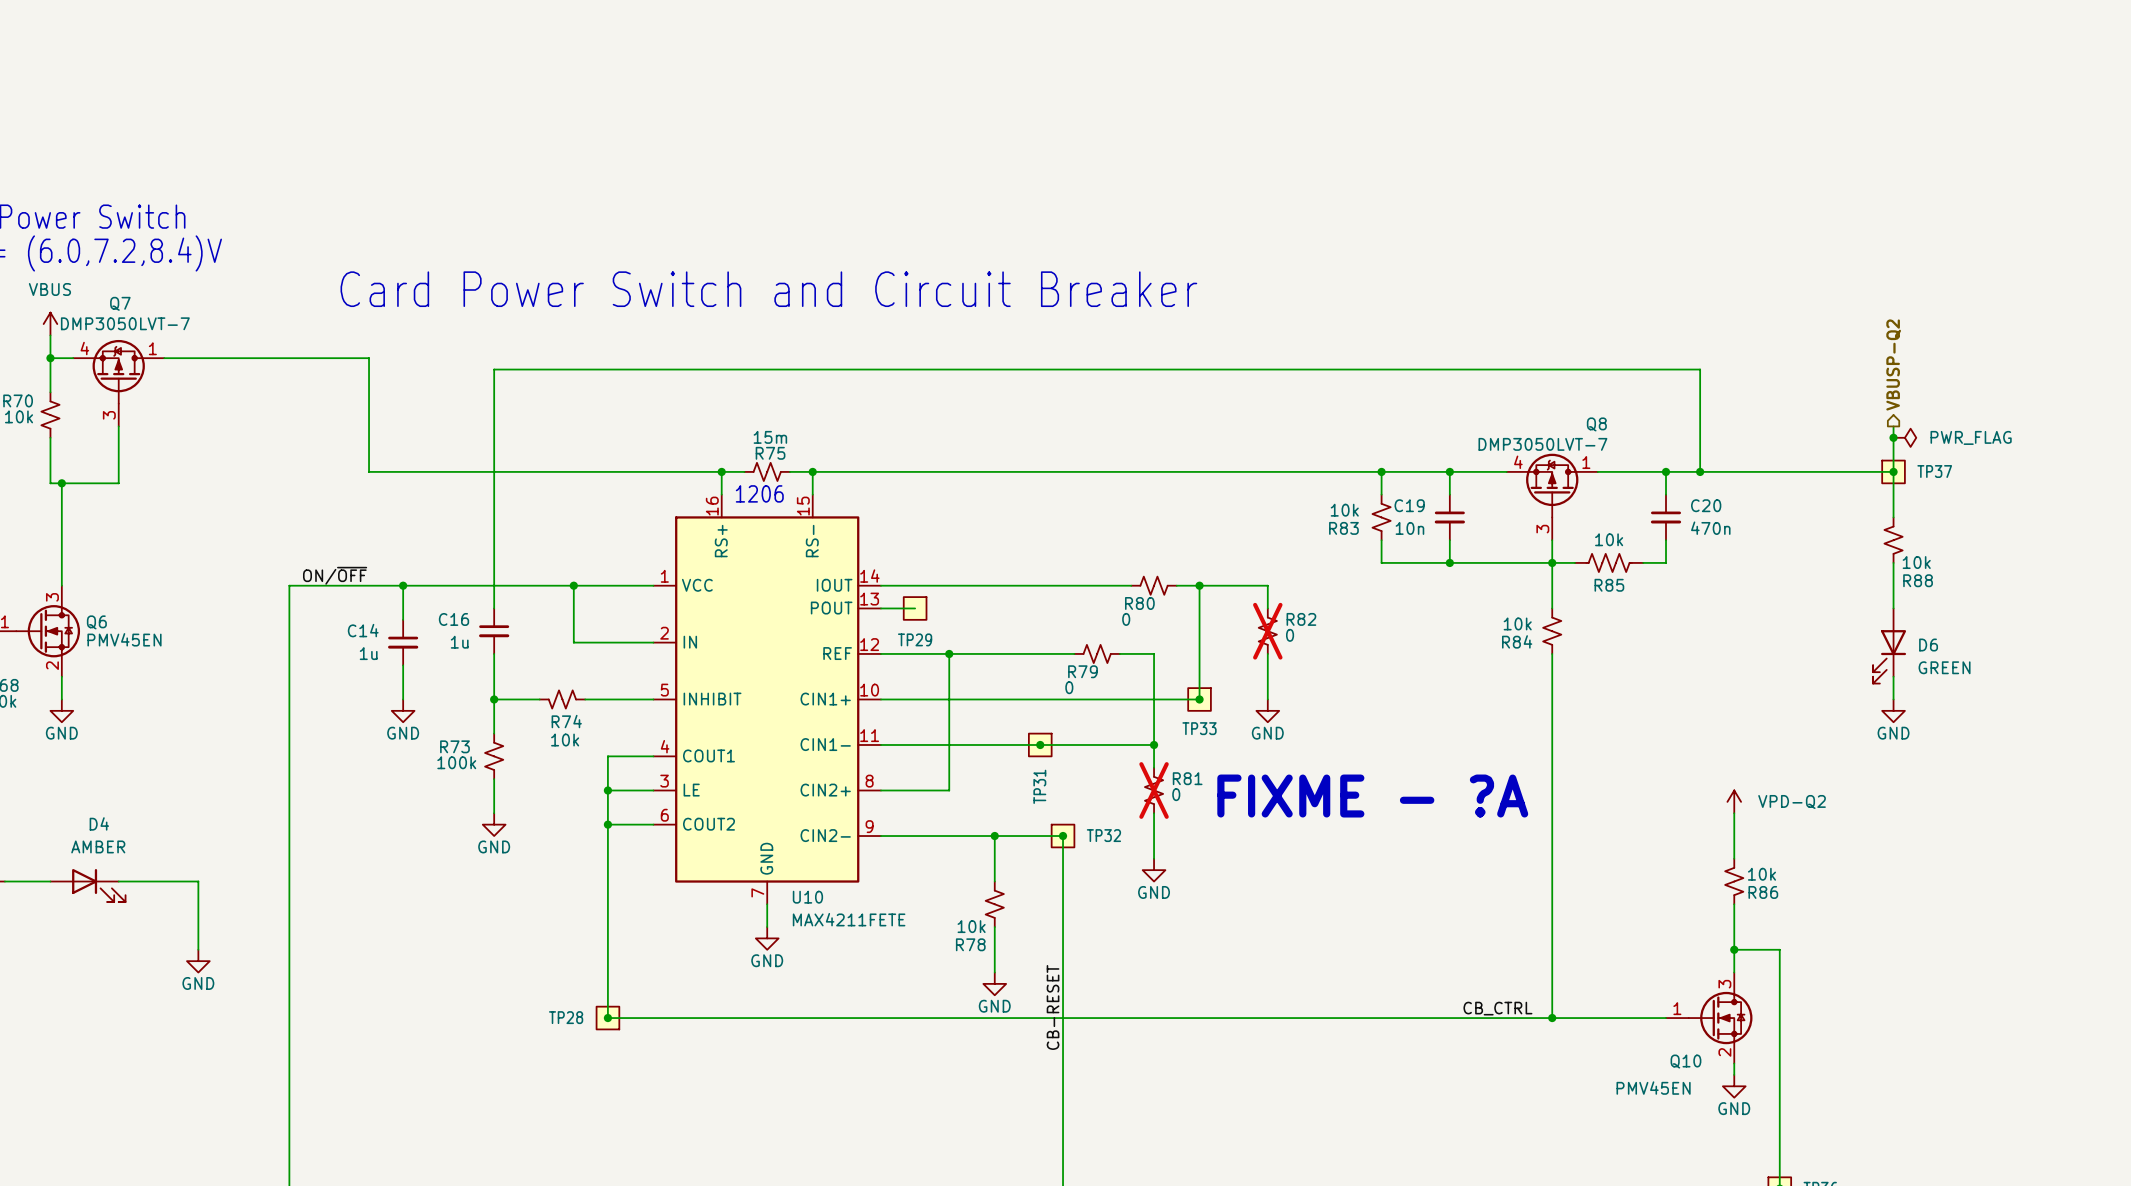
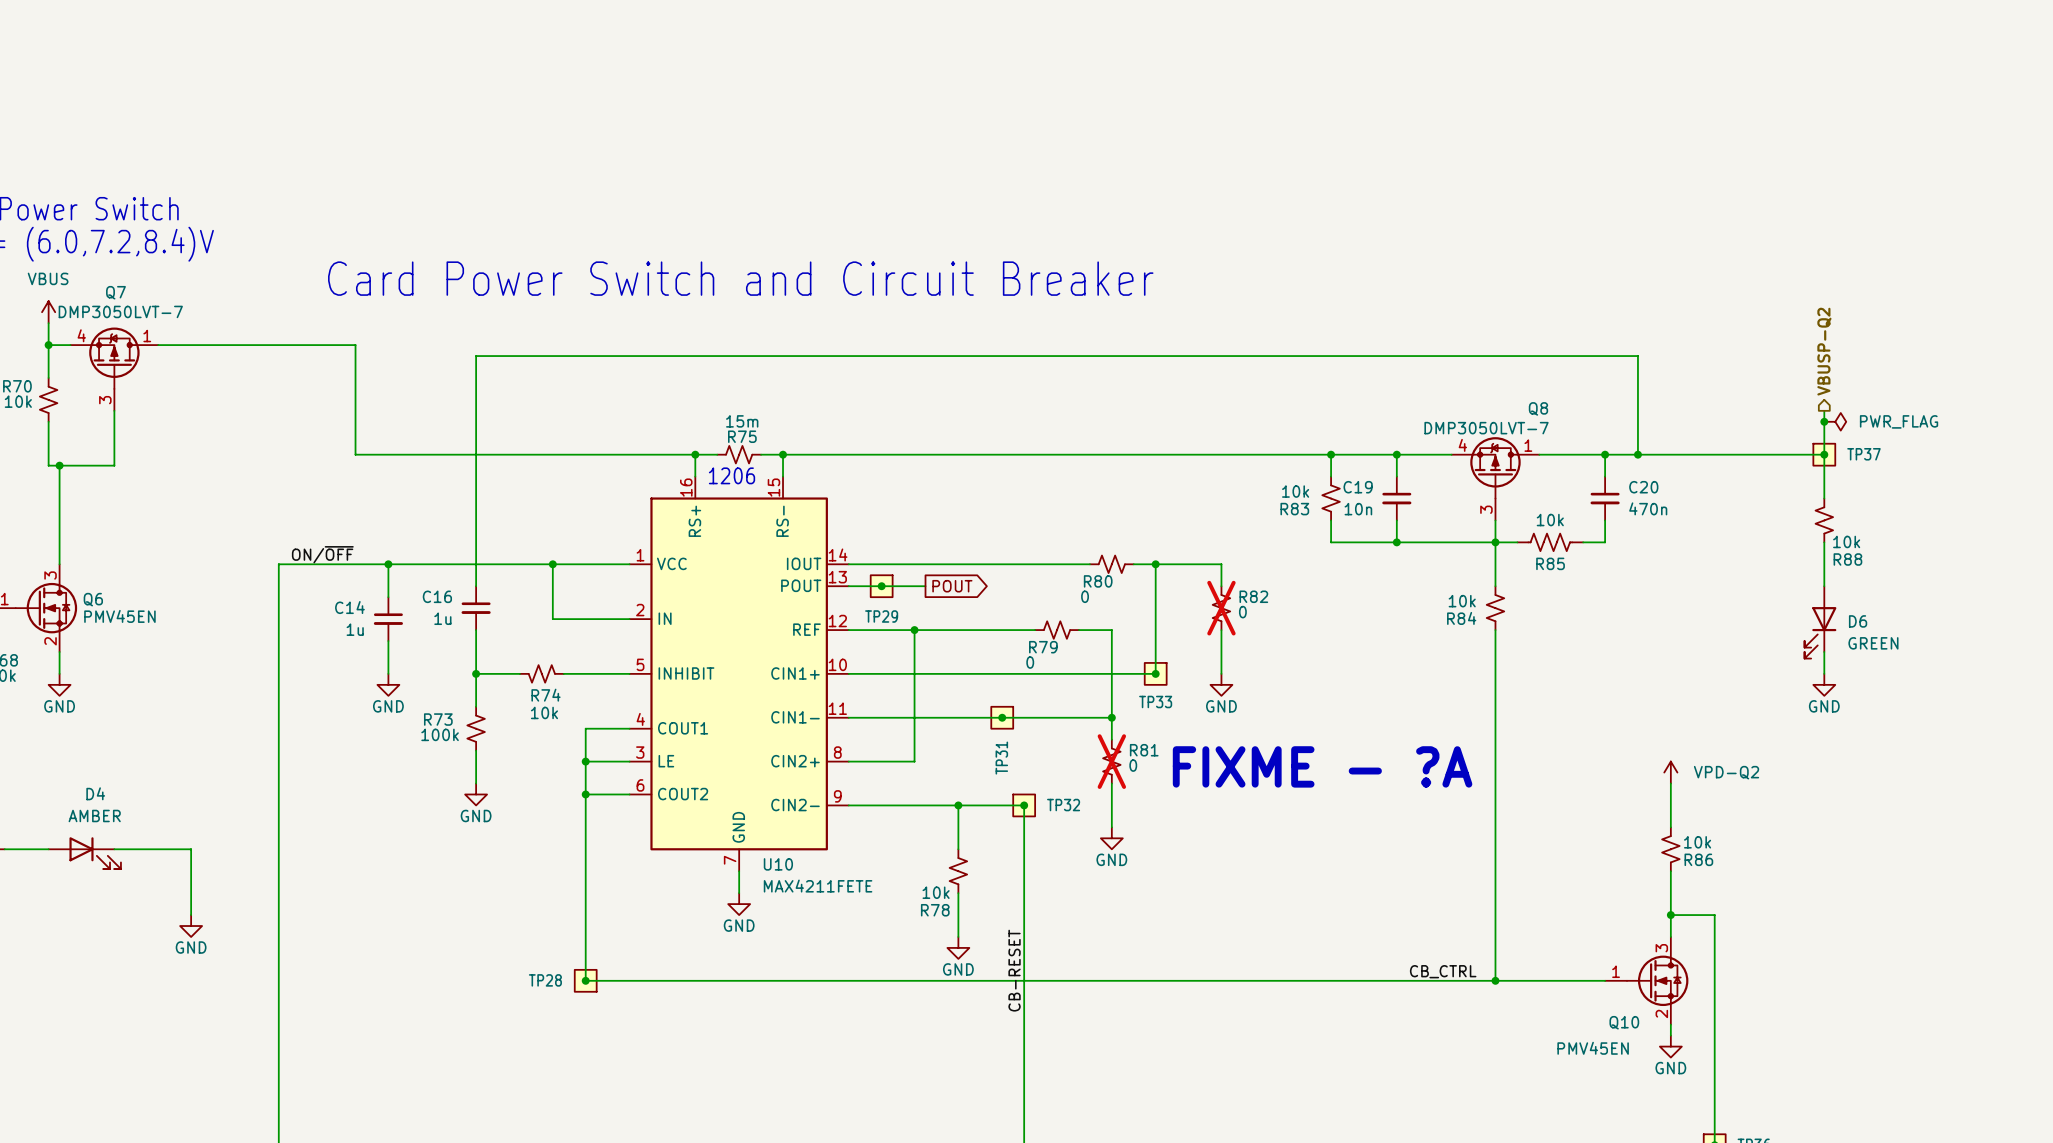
wire: none -> (881, 586) (925, 586)
junction: none -> (881, 586)
global label: none -> POUT (952, 586)

